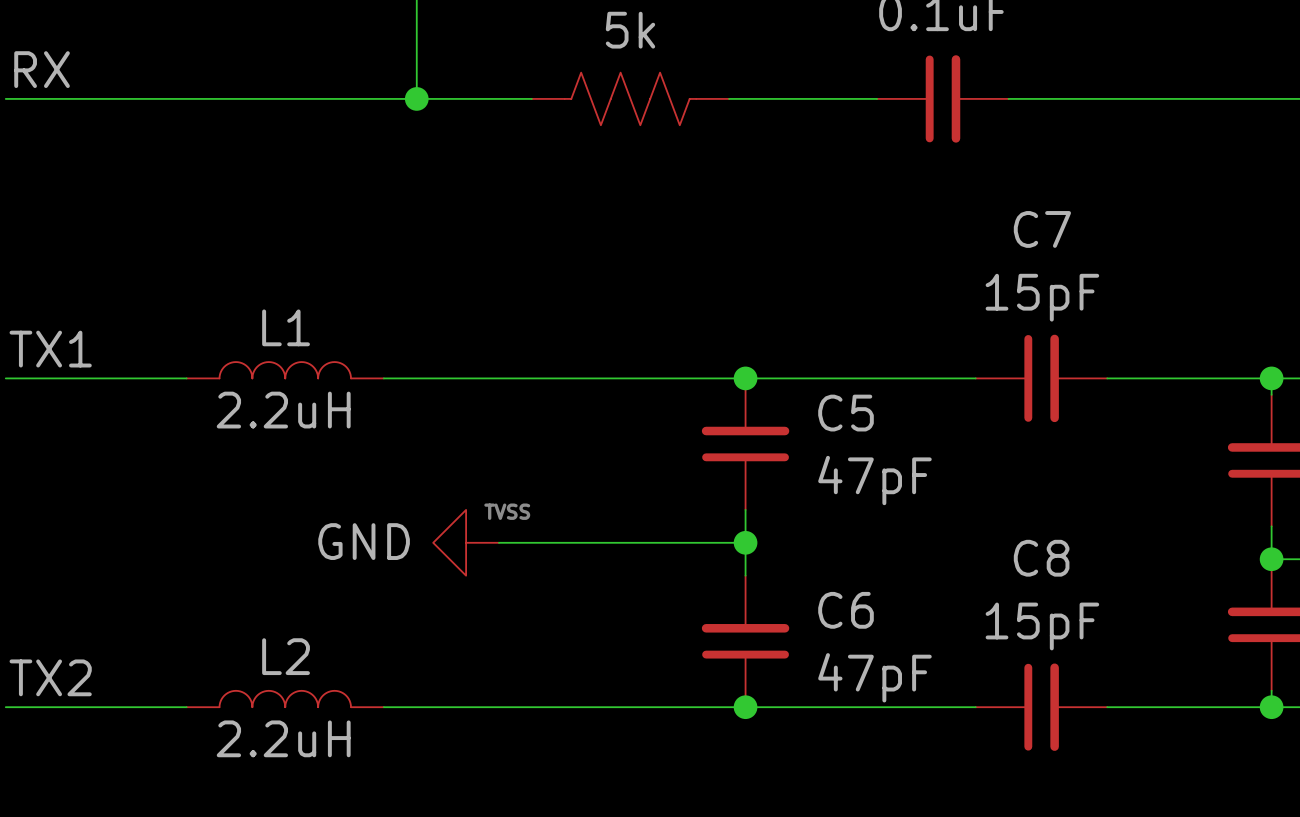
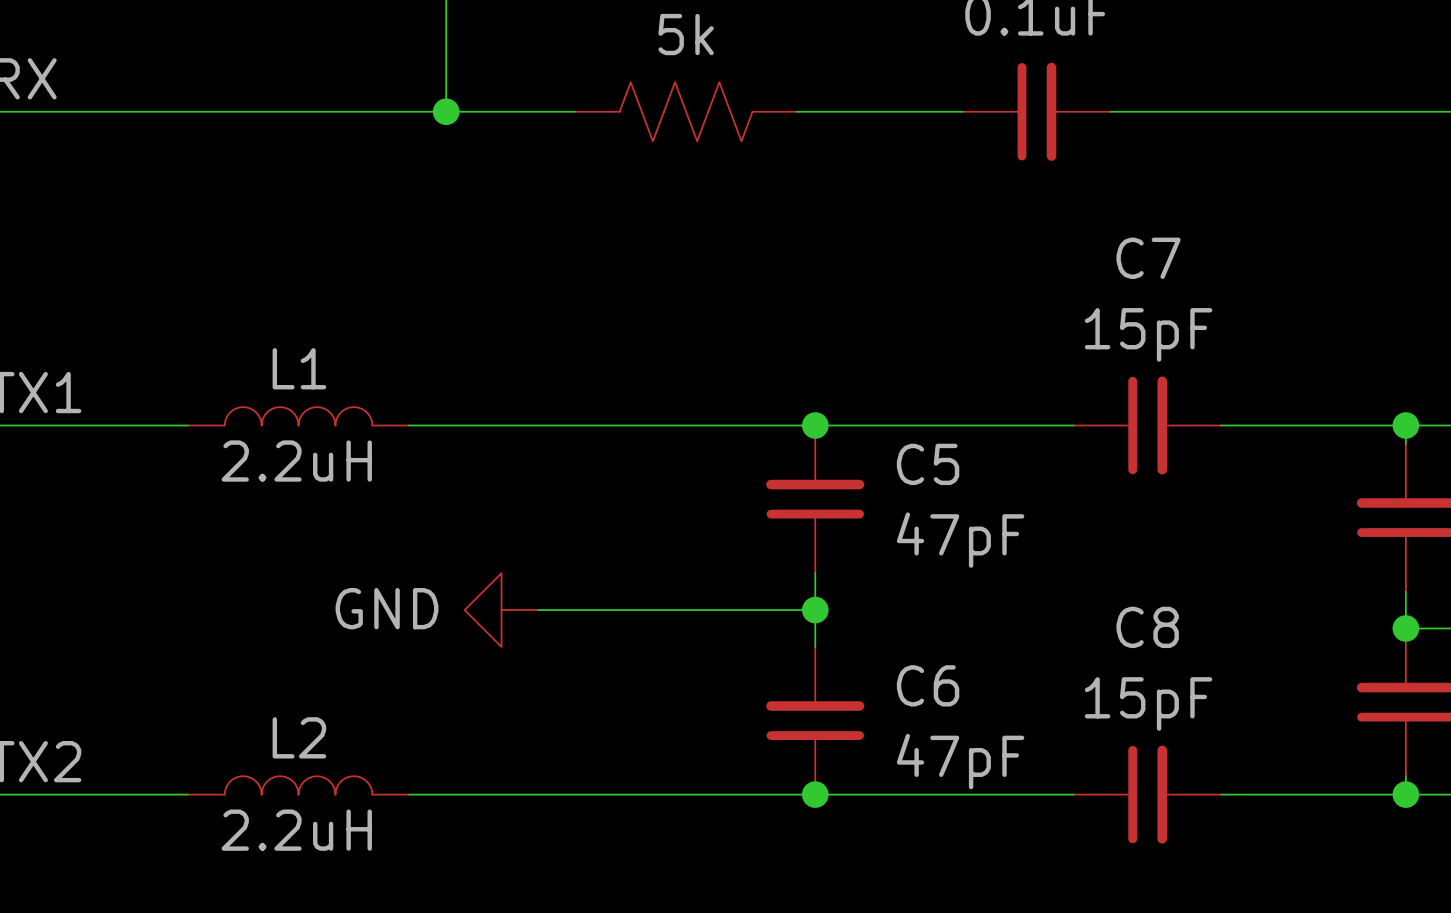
text: TVSS (507, 511) -> none

